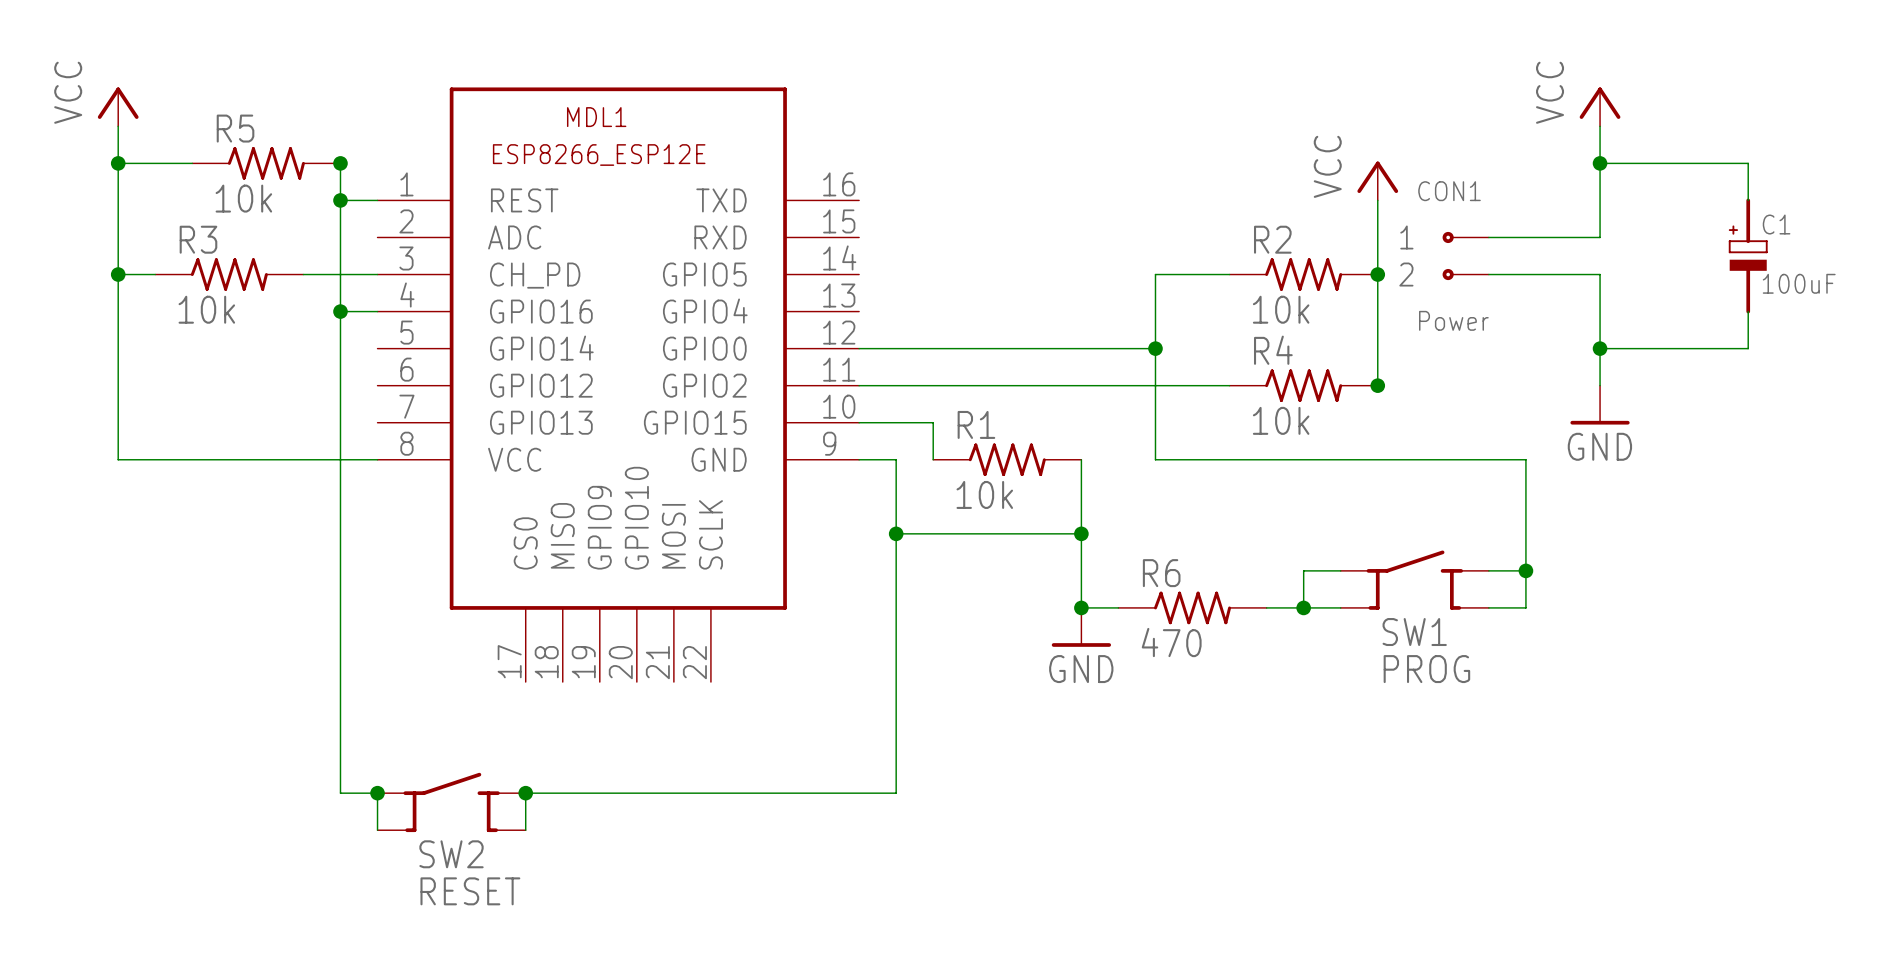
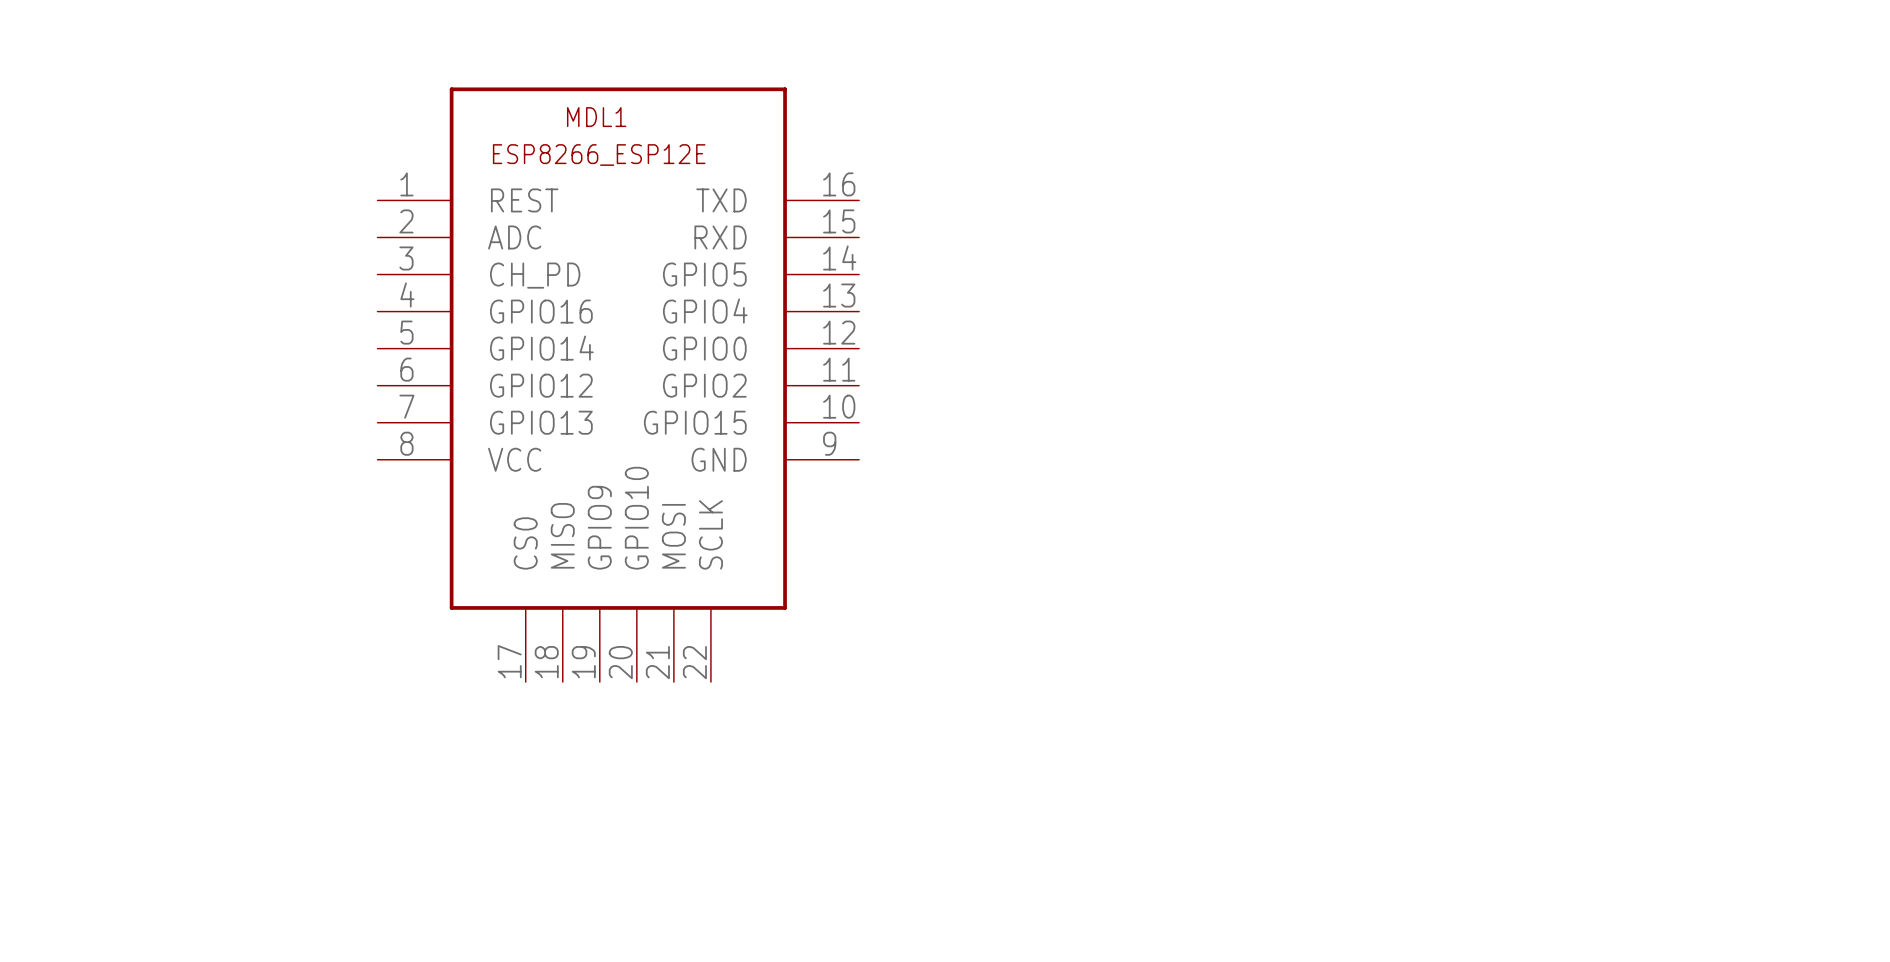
power symbol: VCC (118, 106) -> none
power symbol: VCC (1600, 106) -> none
wire: (118, 126) (118, 459) (377, 459) -> none
wire: (1600, 126) (1600, 237) (1488, 237) -> none
wire: (118, 163) (192, 163) -> none
junction: (118, 163) -> none
R5: 10k (266, 163) -> none
wire: (340, 163) (340, 793) (377, 793) (377, 830) -> none
junction: (340, 163) -> none
wire: (1600, 163) (1748, 163) (1748, 200) -> none
junction: (1600, 163) -> none
power symbol: VCC (1377, 180) -> none
wire: (340, 200) (377, 200) -> none
junction: (340, 200) -> none
wire: (1377, 200) (1377, 385) -> none
CON1: Power (1465, 256) -> none
C1: 100uF (1748, 256) -> none
wire: (118, 274) (155, 274) -> none
junction: (118, 274) -> none
R3: 10k (229, 274) -> none
wire: (303, 274) (377, 274) -> none
wire: (1229, 274) (1155, 274) (1155, 459) (1525, 459) (1525, 607) (1488, 607) -> none
R2: 10k (1303, 274) -> none
junction: (1377, 274) -> none
wire: (1488, 274) (1600, 274) (1600, 385) -> none
wire: (340, 311) (377, 311) -> none
junction: (340, 311) -> none
wire: (1748, 311) (1748, 348) (1600, 348) -> none
wire: (859, 348) (1155, 348) -> none
junction: (1155, 348) -> none
junction: (1600, 348) -> none
wire: (859, 385) (1229, 385) -> none
R4: 10k (1303, 385) -> none
junction: (1377, 385) -> none
power symbol: GND (1600, 405) -> none
wire: (859, 422) (933, 422) (933, 459) -> none
wire: (859, 459) (896, 459) (896, 793) (525, 793) (525, 830) -> none
R1: 10k (1007, 459) -> none
wire: (1081, 459) (1081, 607) (1118, 607) -> none
wire: (896, 533) (1081, 533) -> none
junction: (896, 533) -> none
junction: (1081, 533) -> none
wire: (1340, 570) (1303, 570) (1303, 607) -> none
wire: (1488, 570) (1525, 570) -> none
junction: (1525, 570) -> none
SW1: PROG (1414, 580) -> none
junction: (1081, 607) -> none
R6: 470 (1192, 607) -> none
wire: (1266, 607) (1340, 607) -> none
junction: (1303, 607) -> none
power symbol: GND (1081, 627) -> none
junction: (377, 793) -> none
junction: (525, 793) -> none
SW2: RESET (451, 802) -> none

